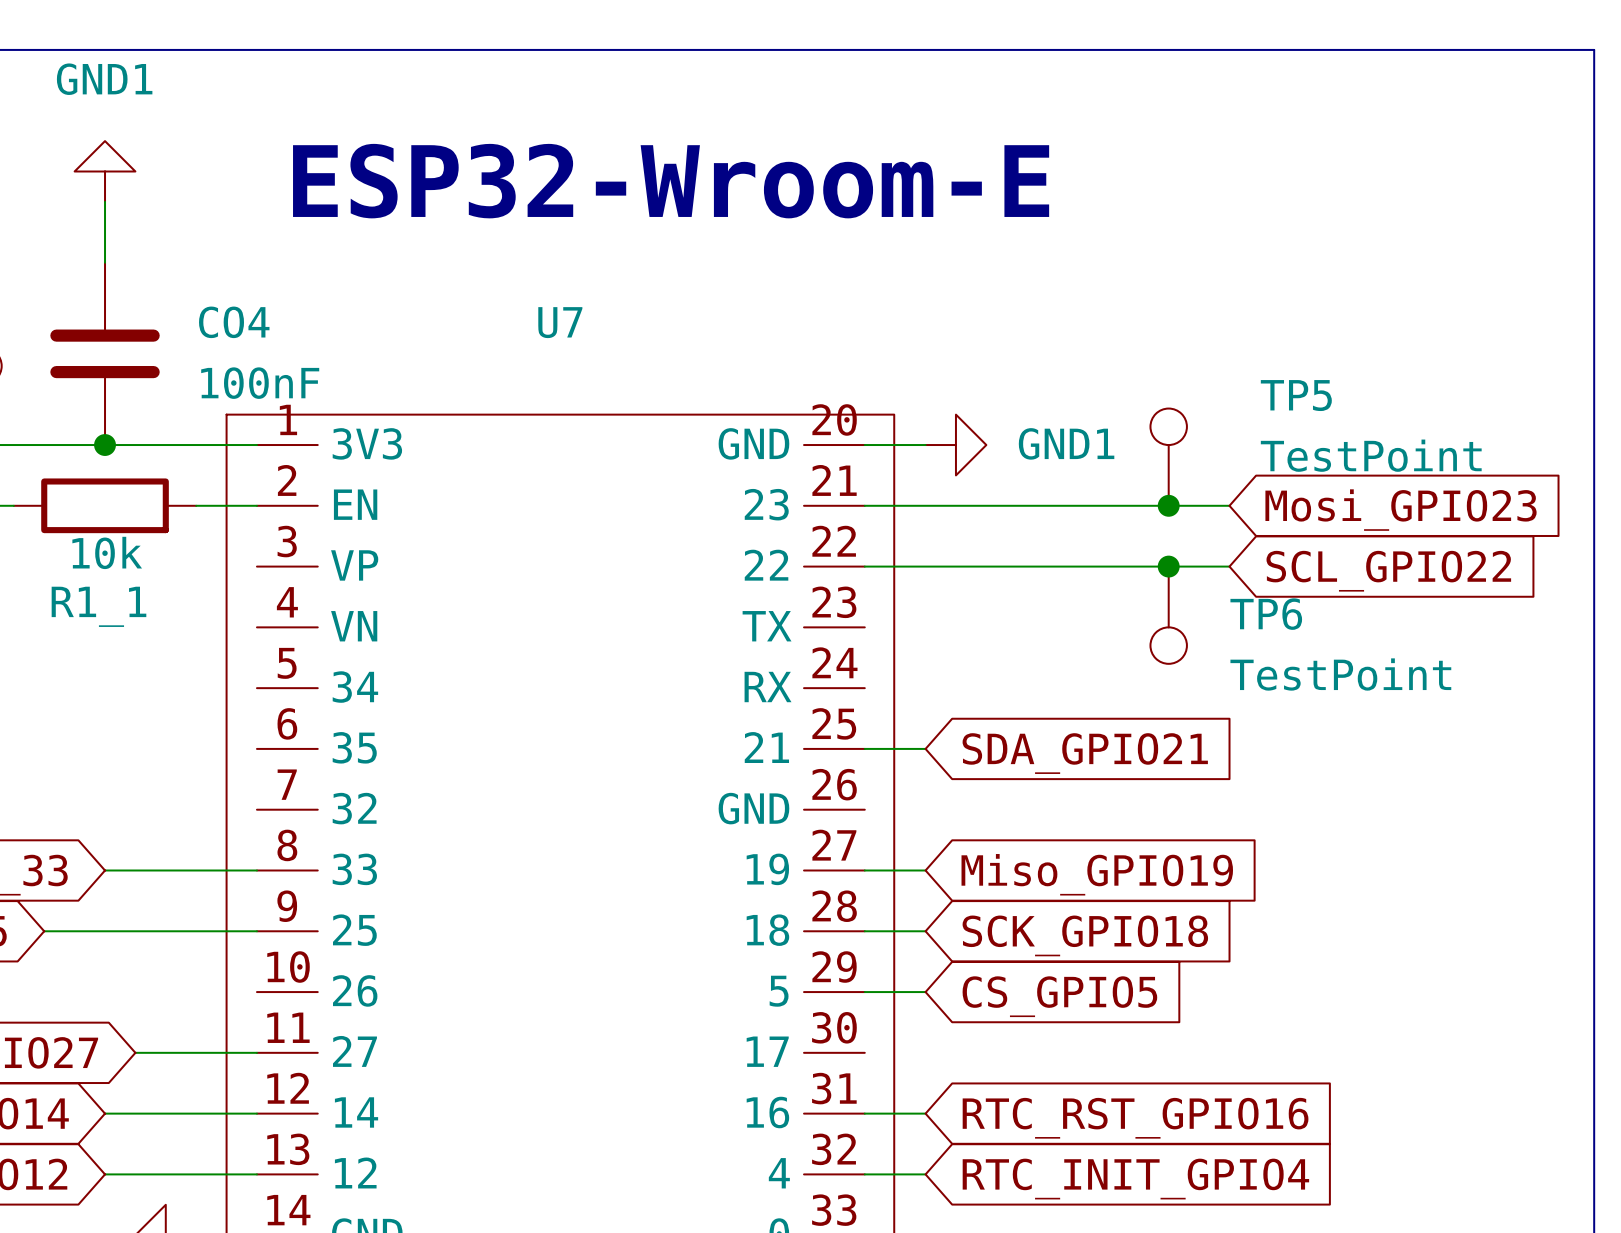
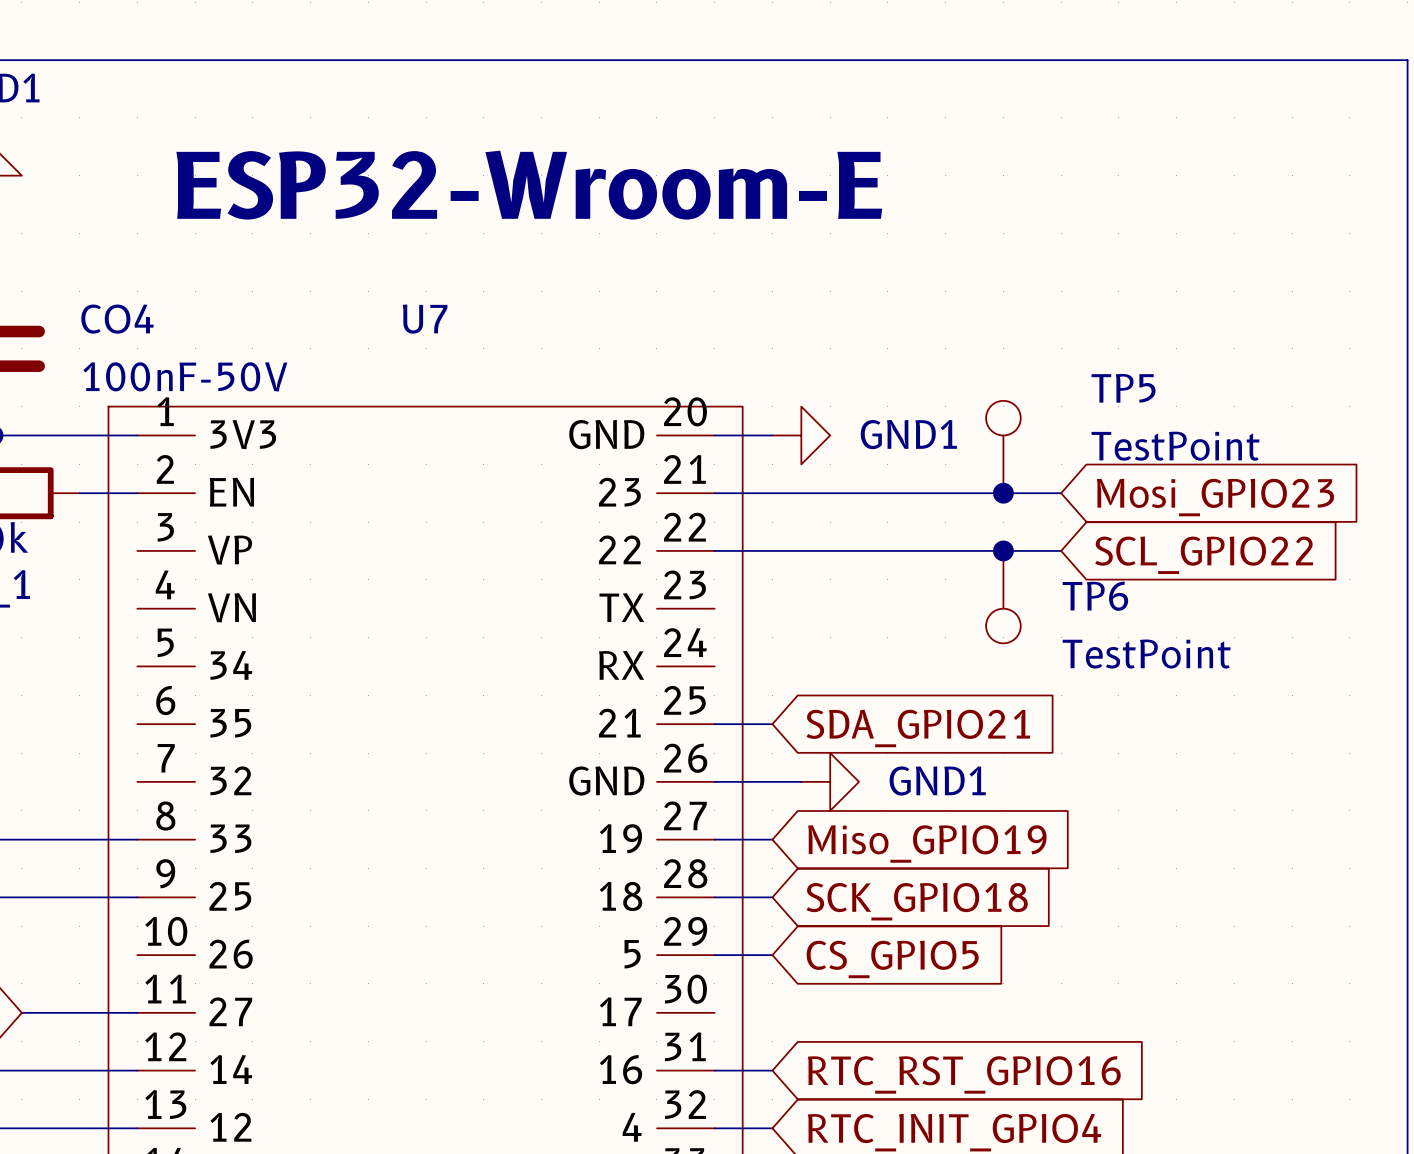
CO4 value: 100nF (260, 383) -> 100nF-50V (185, 376)
wire: none -> (714, 781) (801, 781)
power symbol: none -> GND1 (830, 781)

